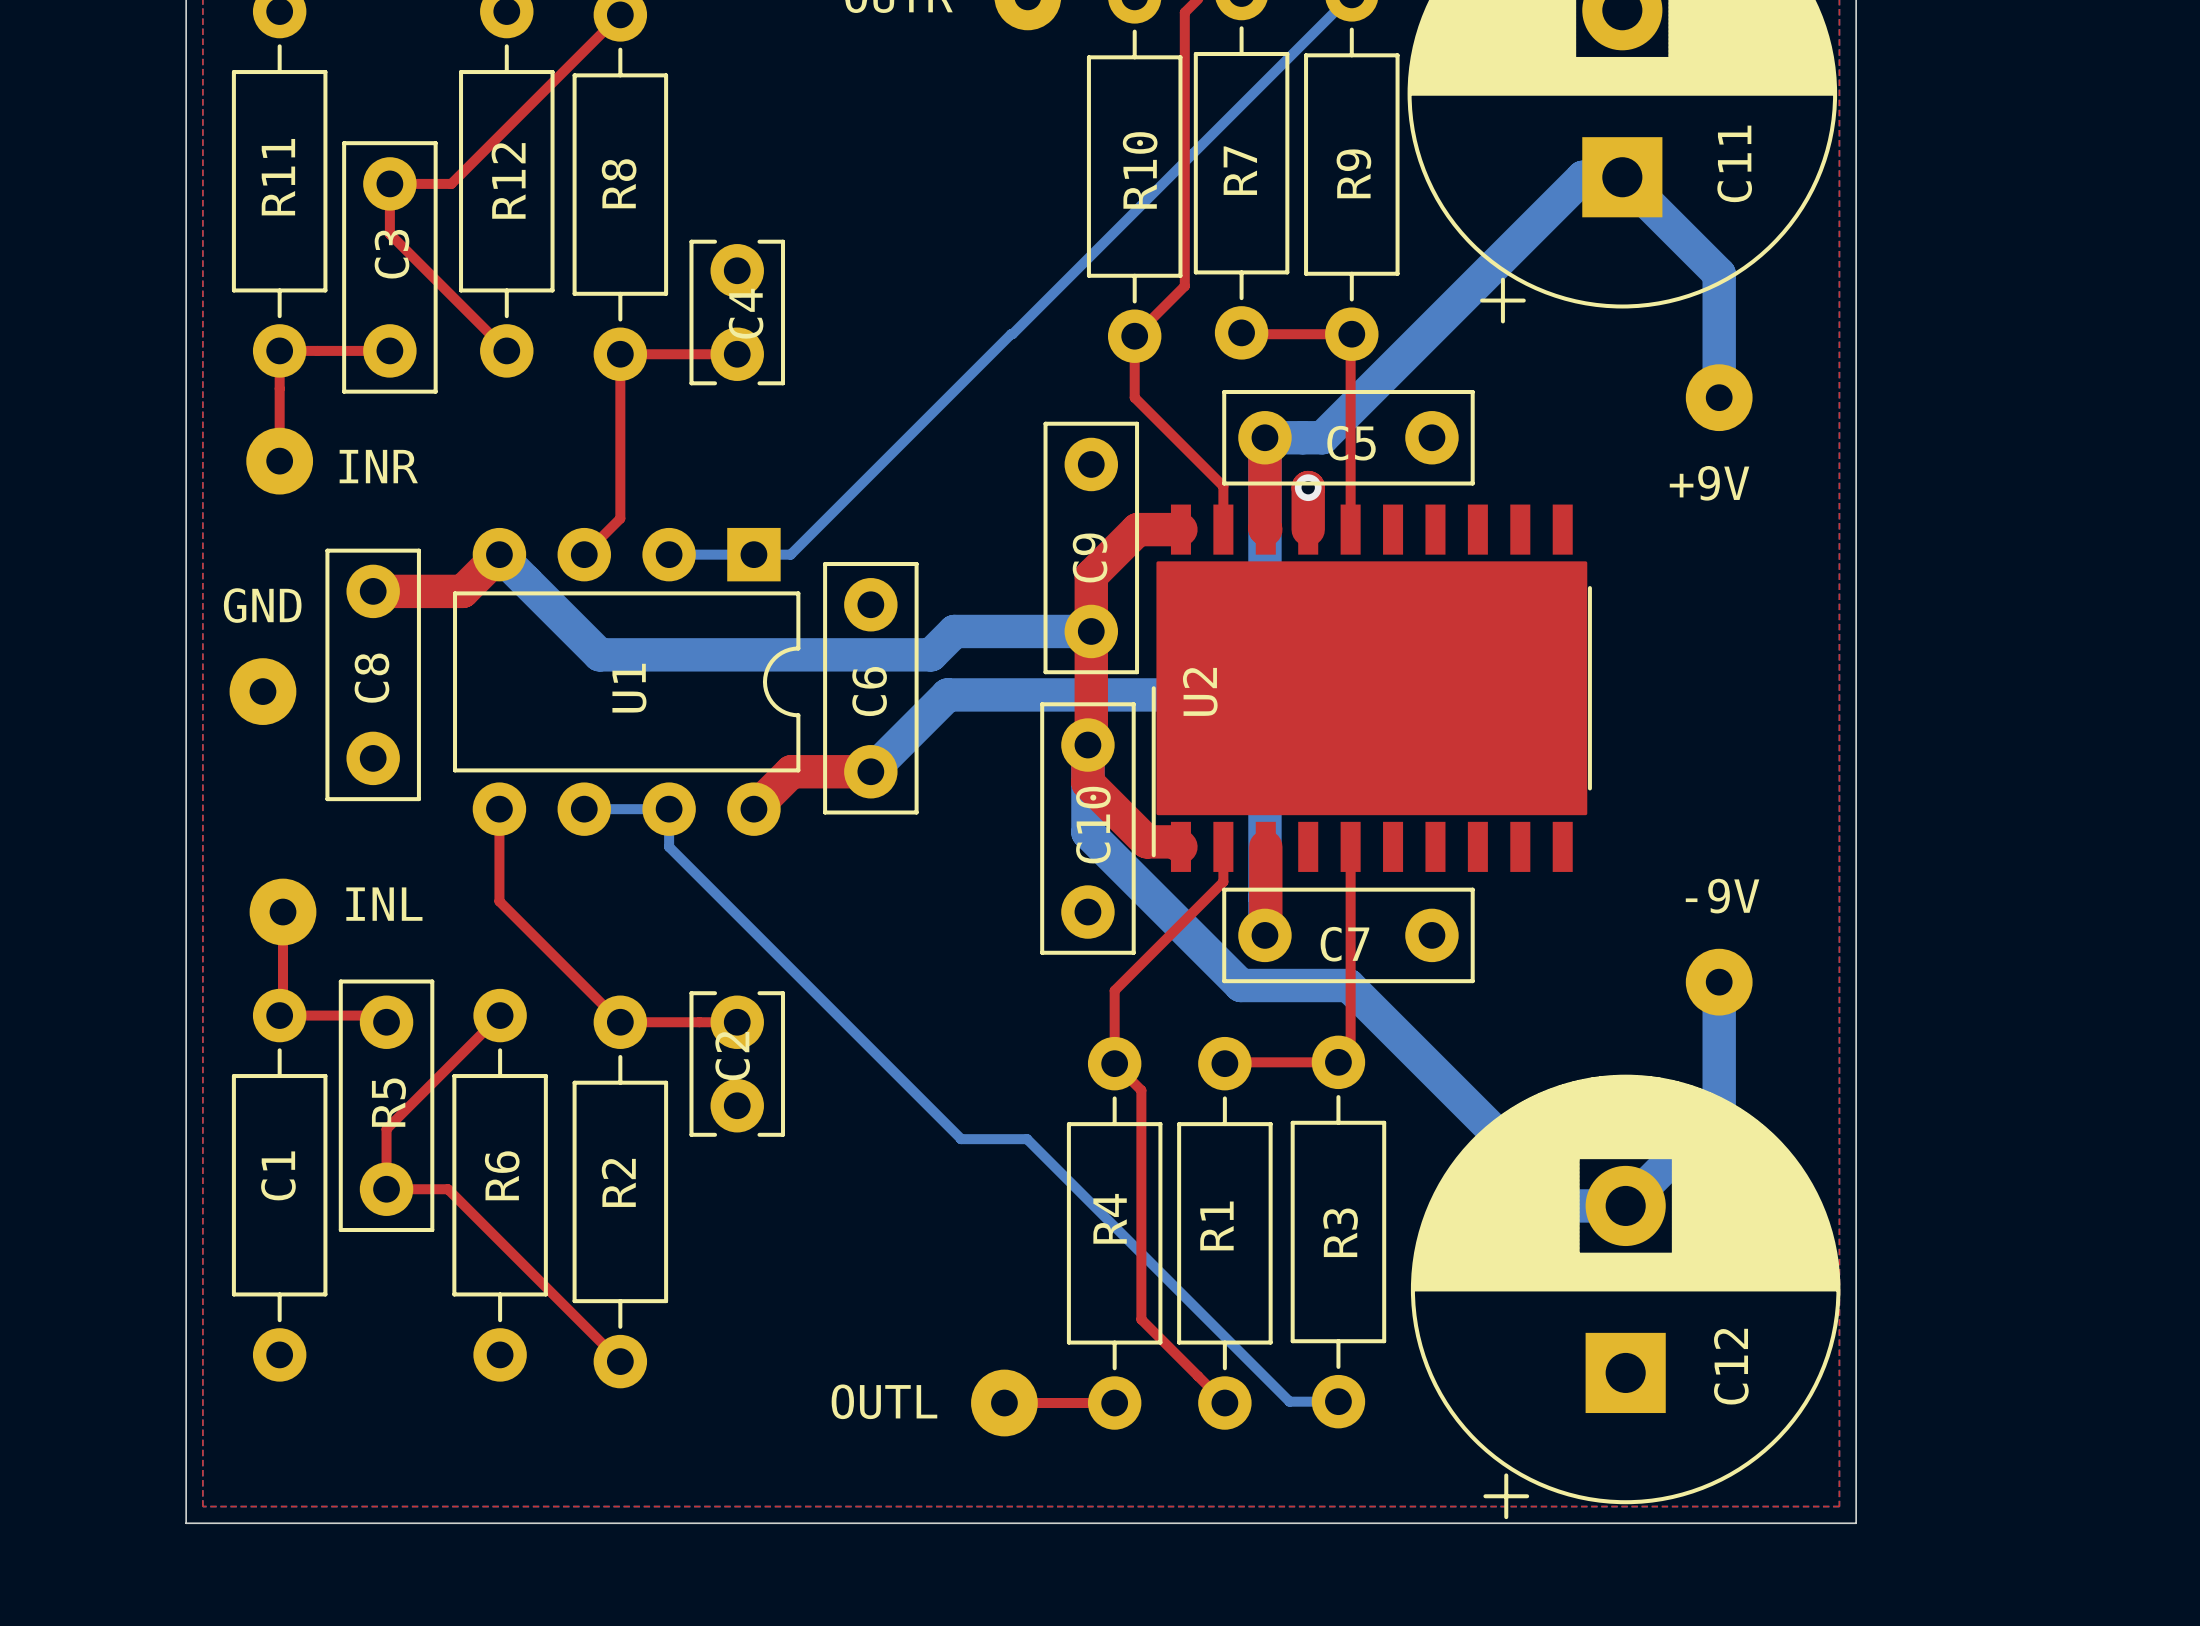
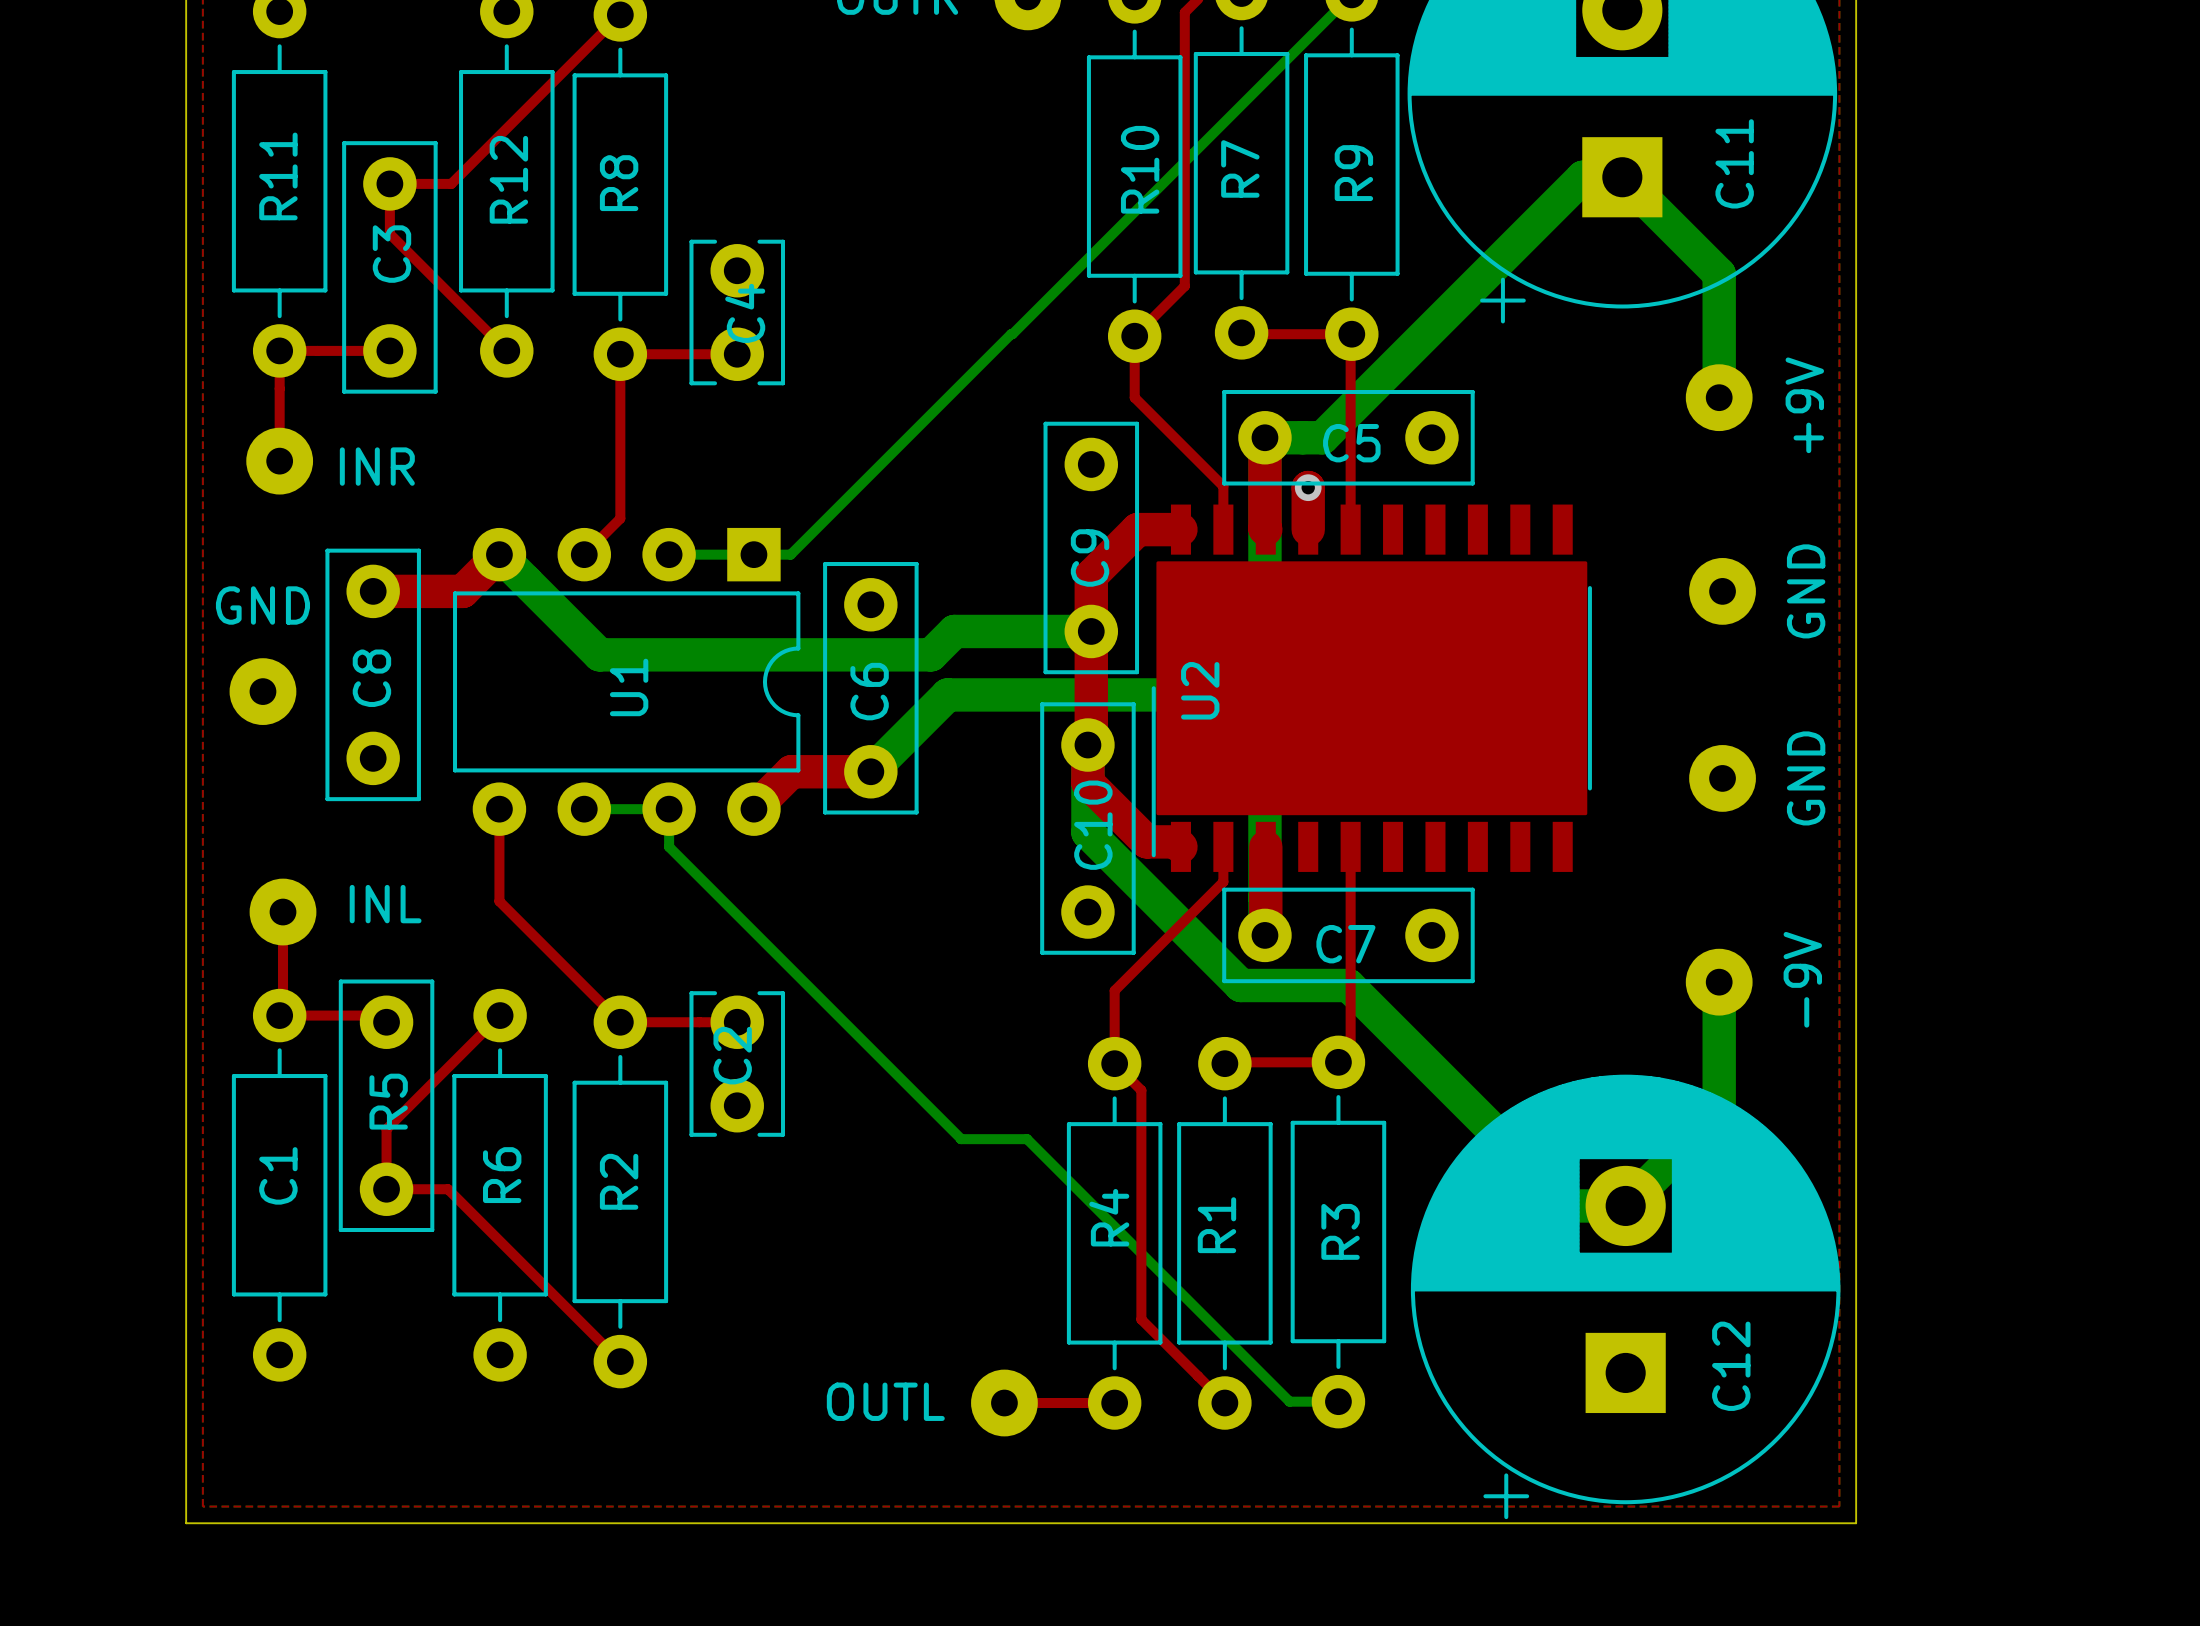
+9V name rotation: 0° (1709, 483) -> 90° counterclockwise (1804, 405)
+9V name position: +9V (1709, 483) -> +9V (1804, 405)
GND: none -> (1722, 591)
GND: none -> (1722, 778)
-9V name rotation: 0° (1722, 896) -> 90° counterclockwise (1802, 979)

